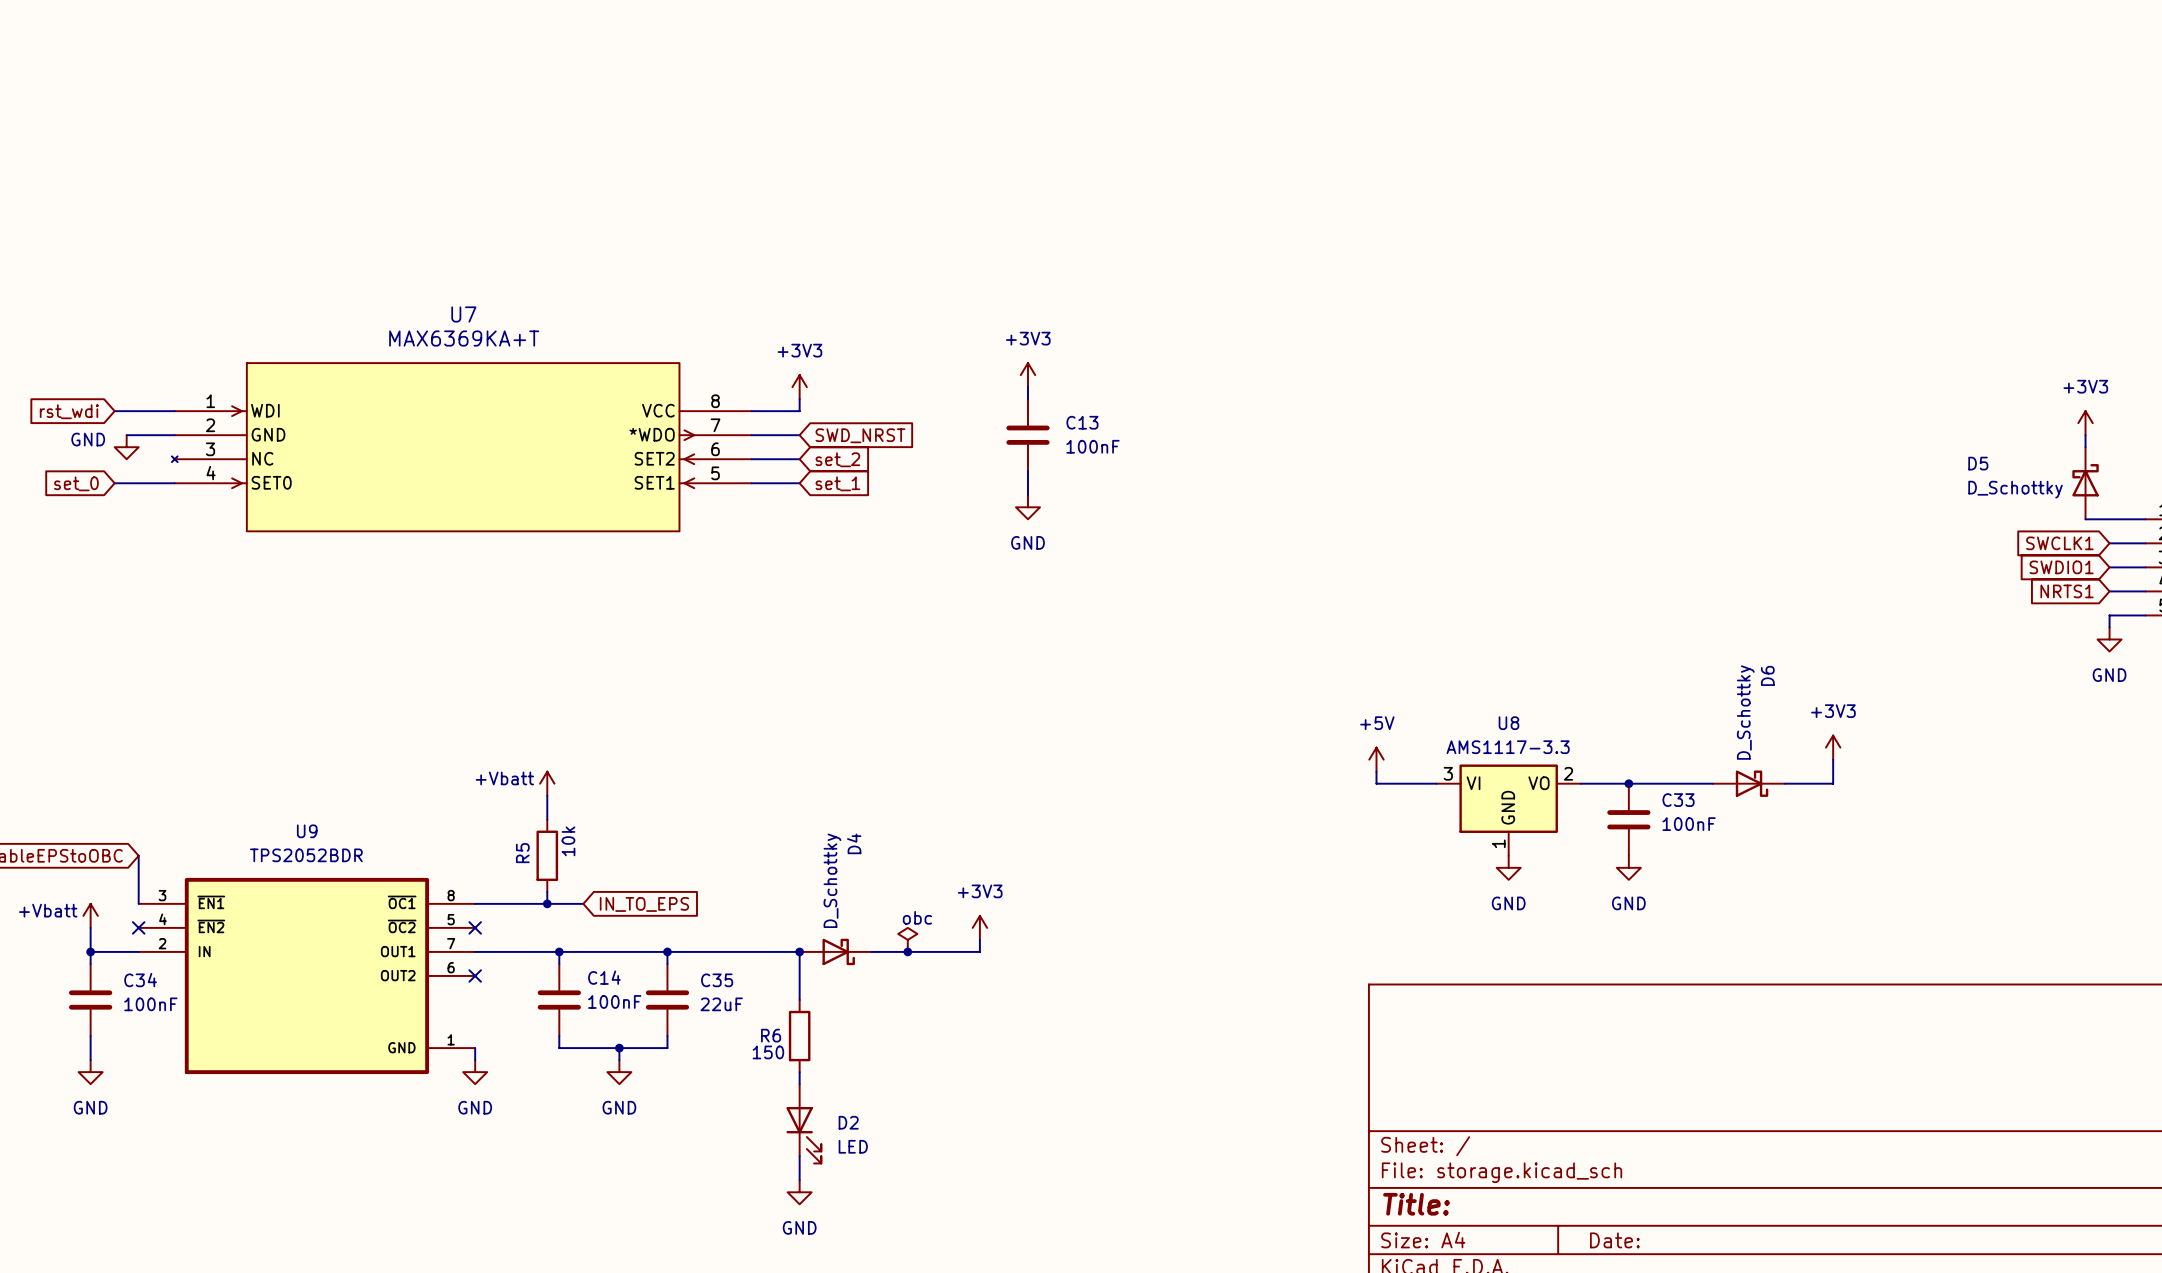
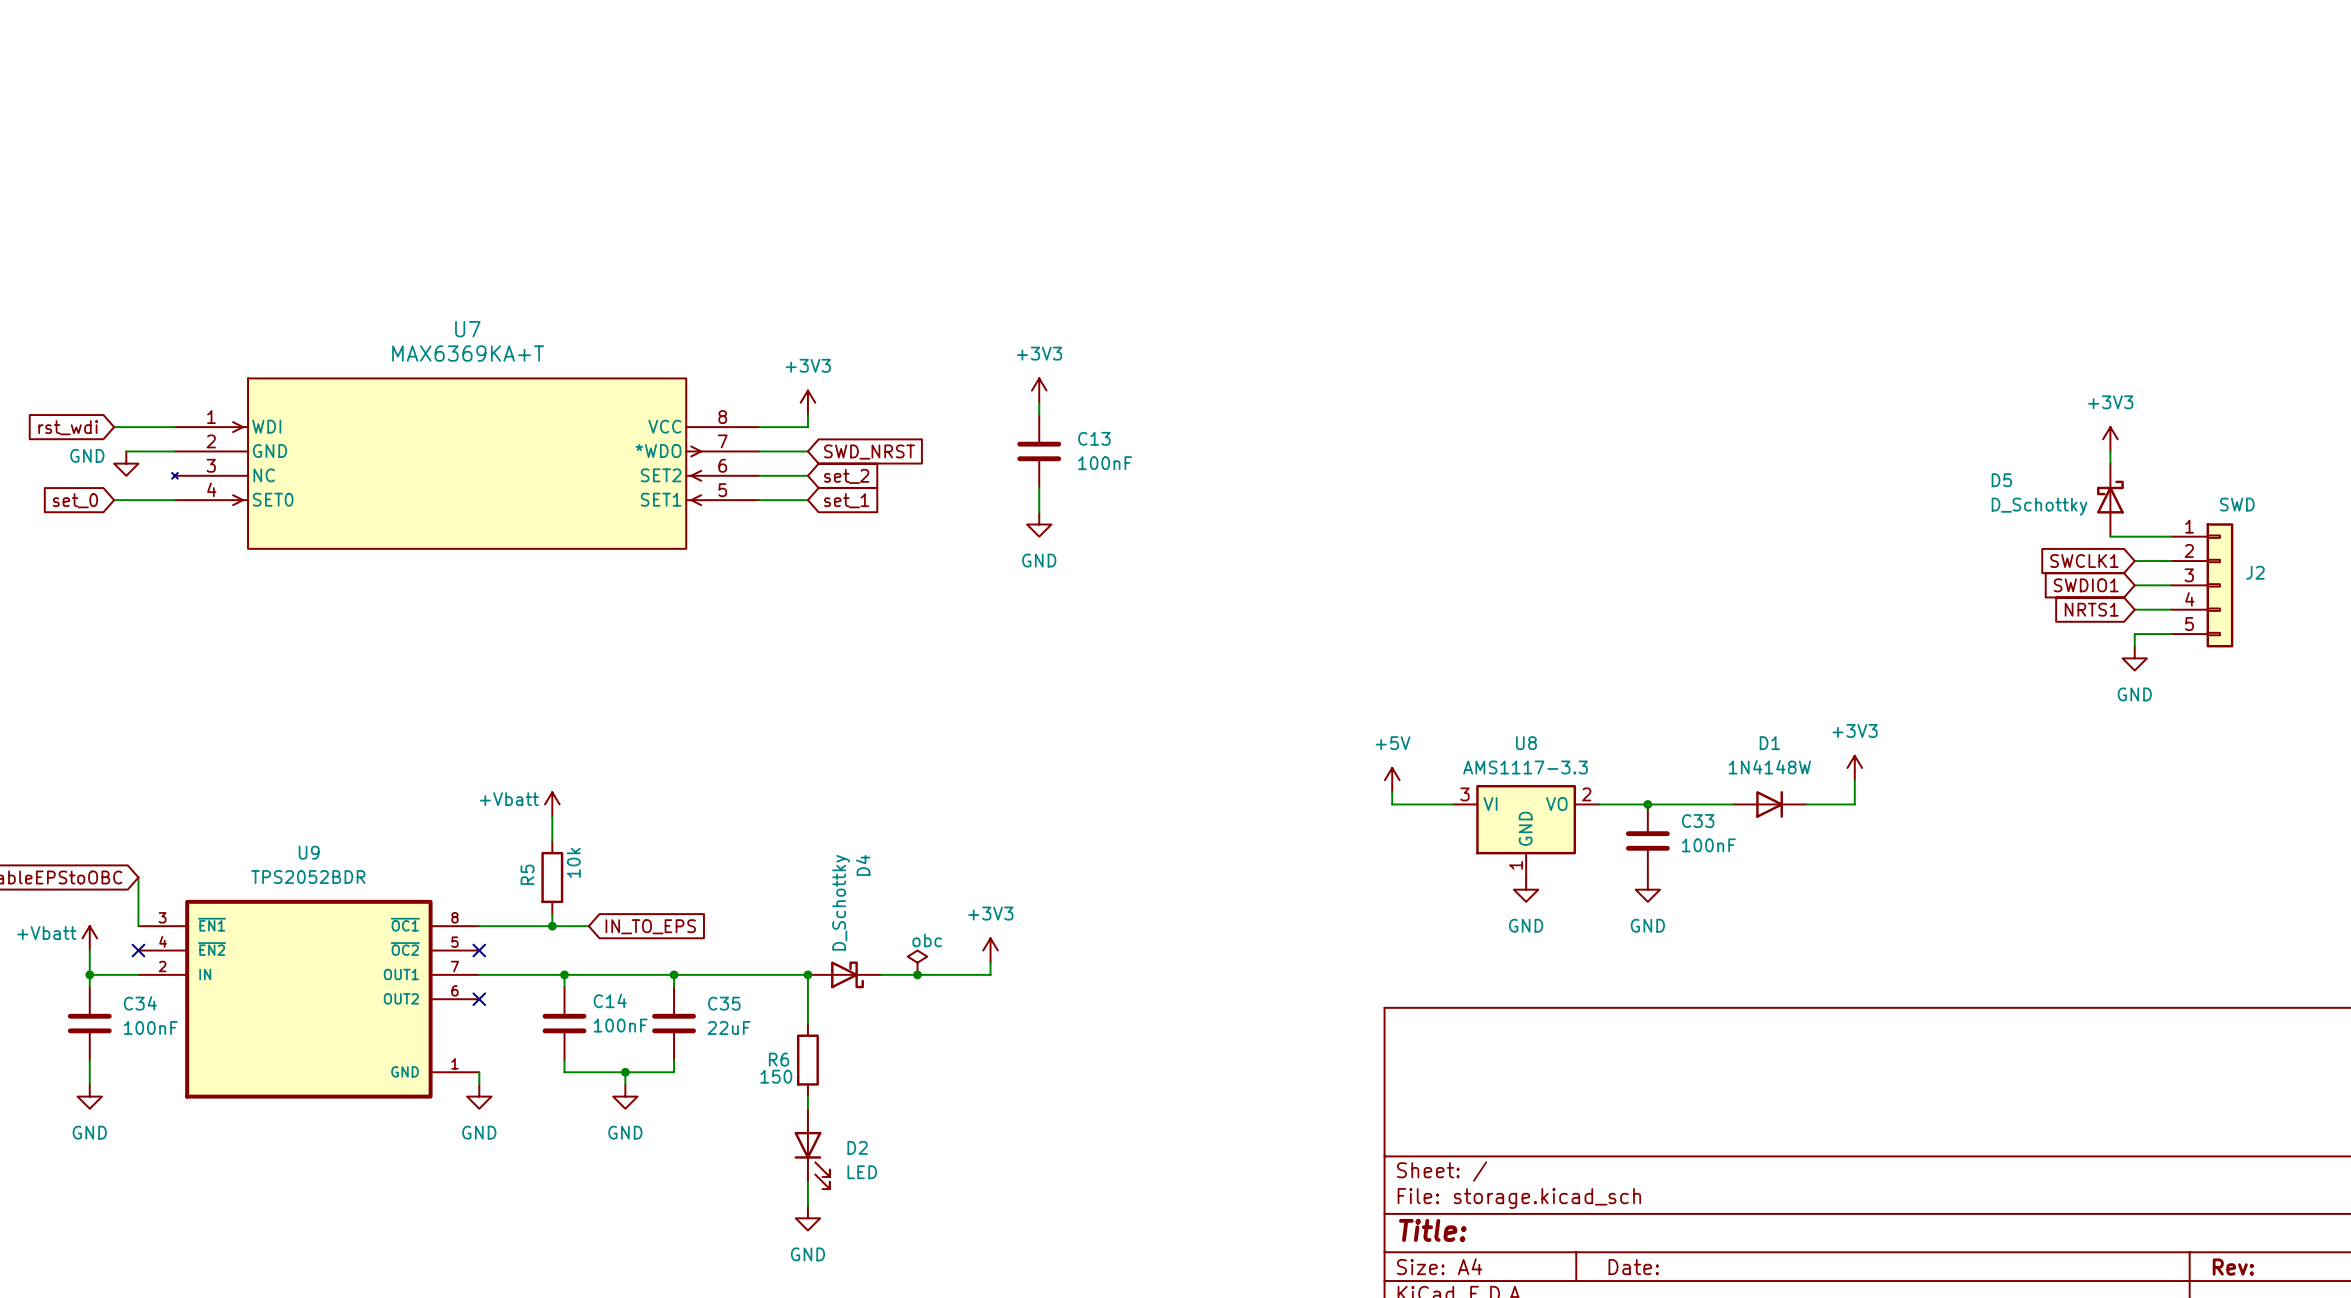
D6: D_Schottky (1749, 783) -> none
D1: none -> 1N4148W (1769, 804)

